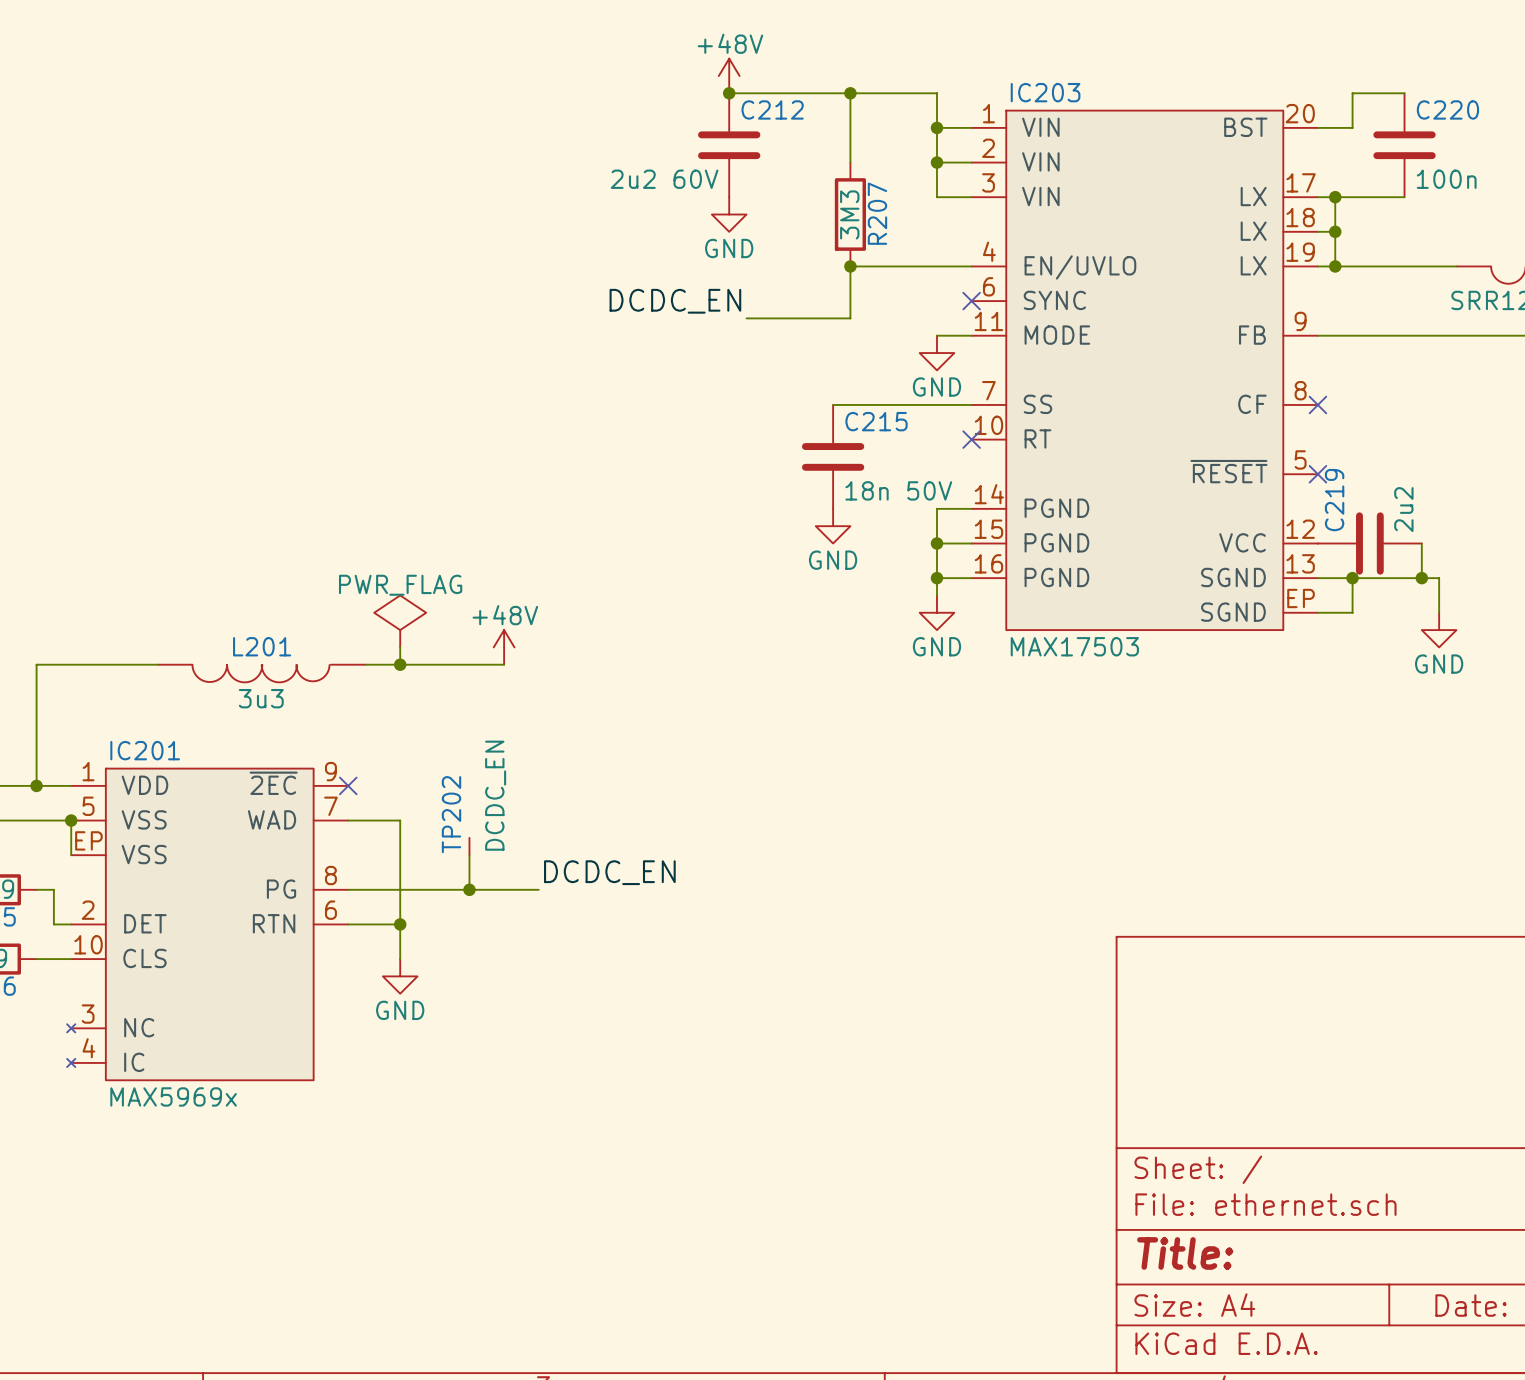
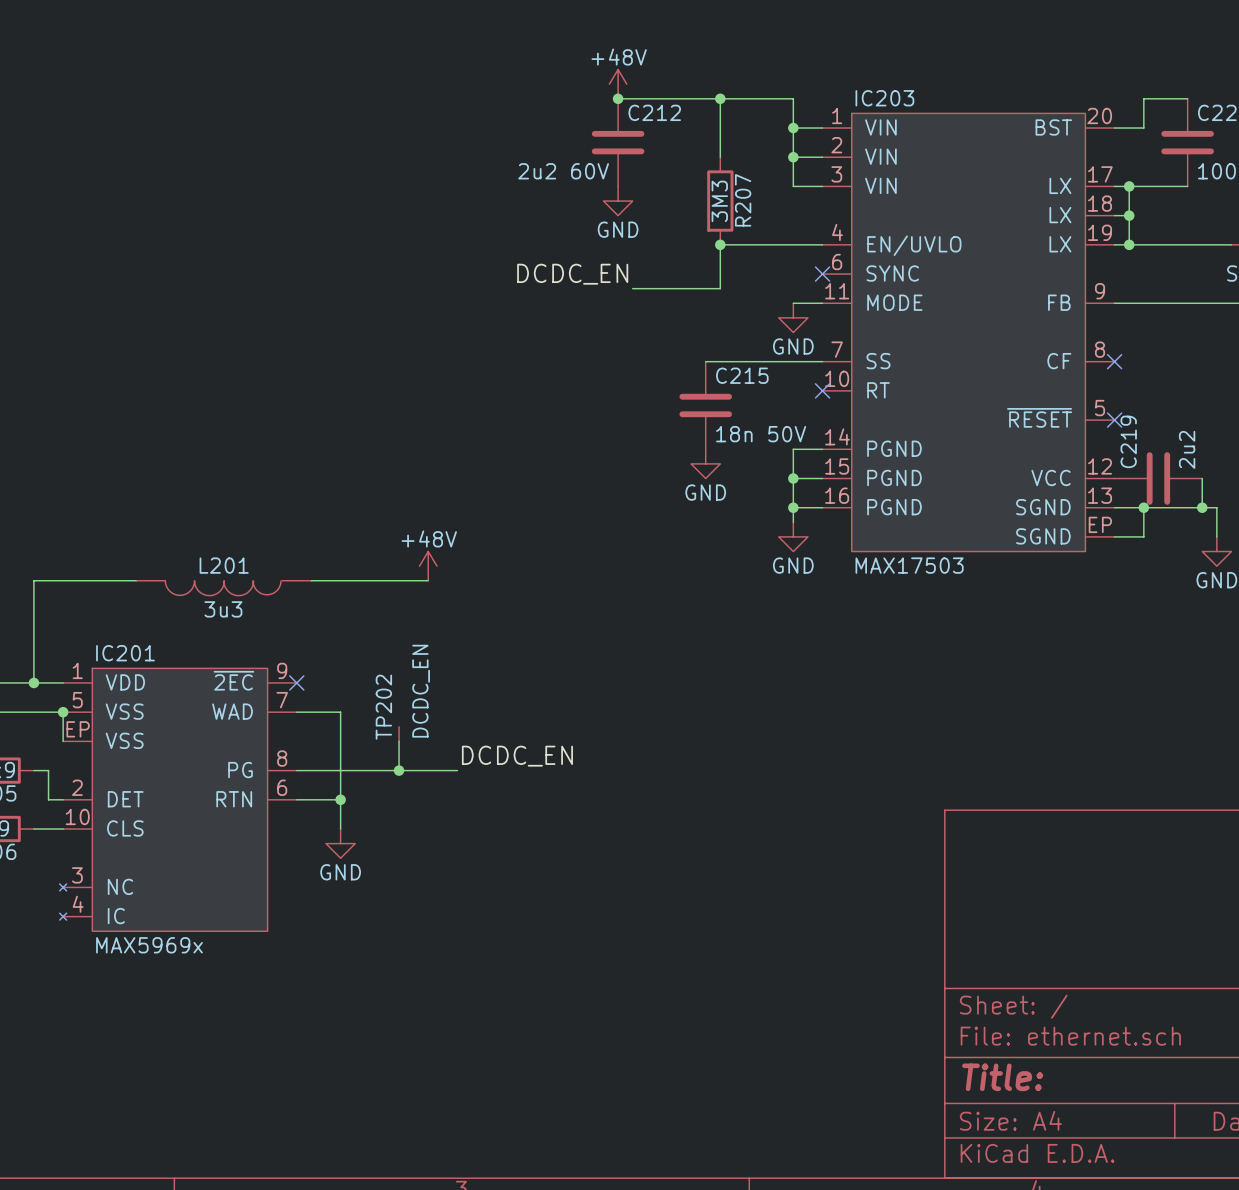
power symbol: PWR_FLAG (400, 621) -> none
wire: (400, 647) (400, 664) -> none
junction: (400, 664) -> none

